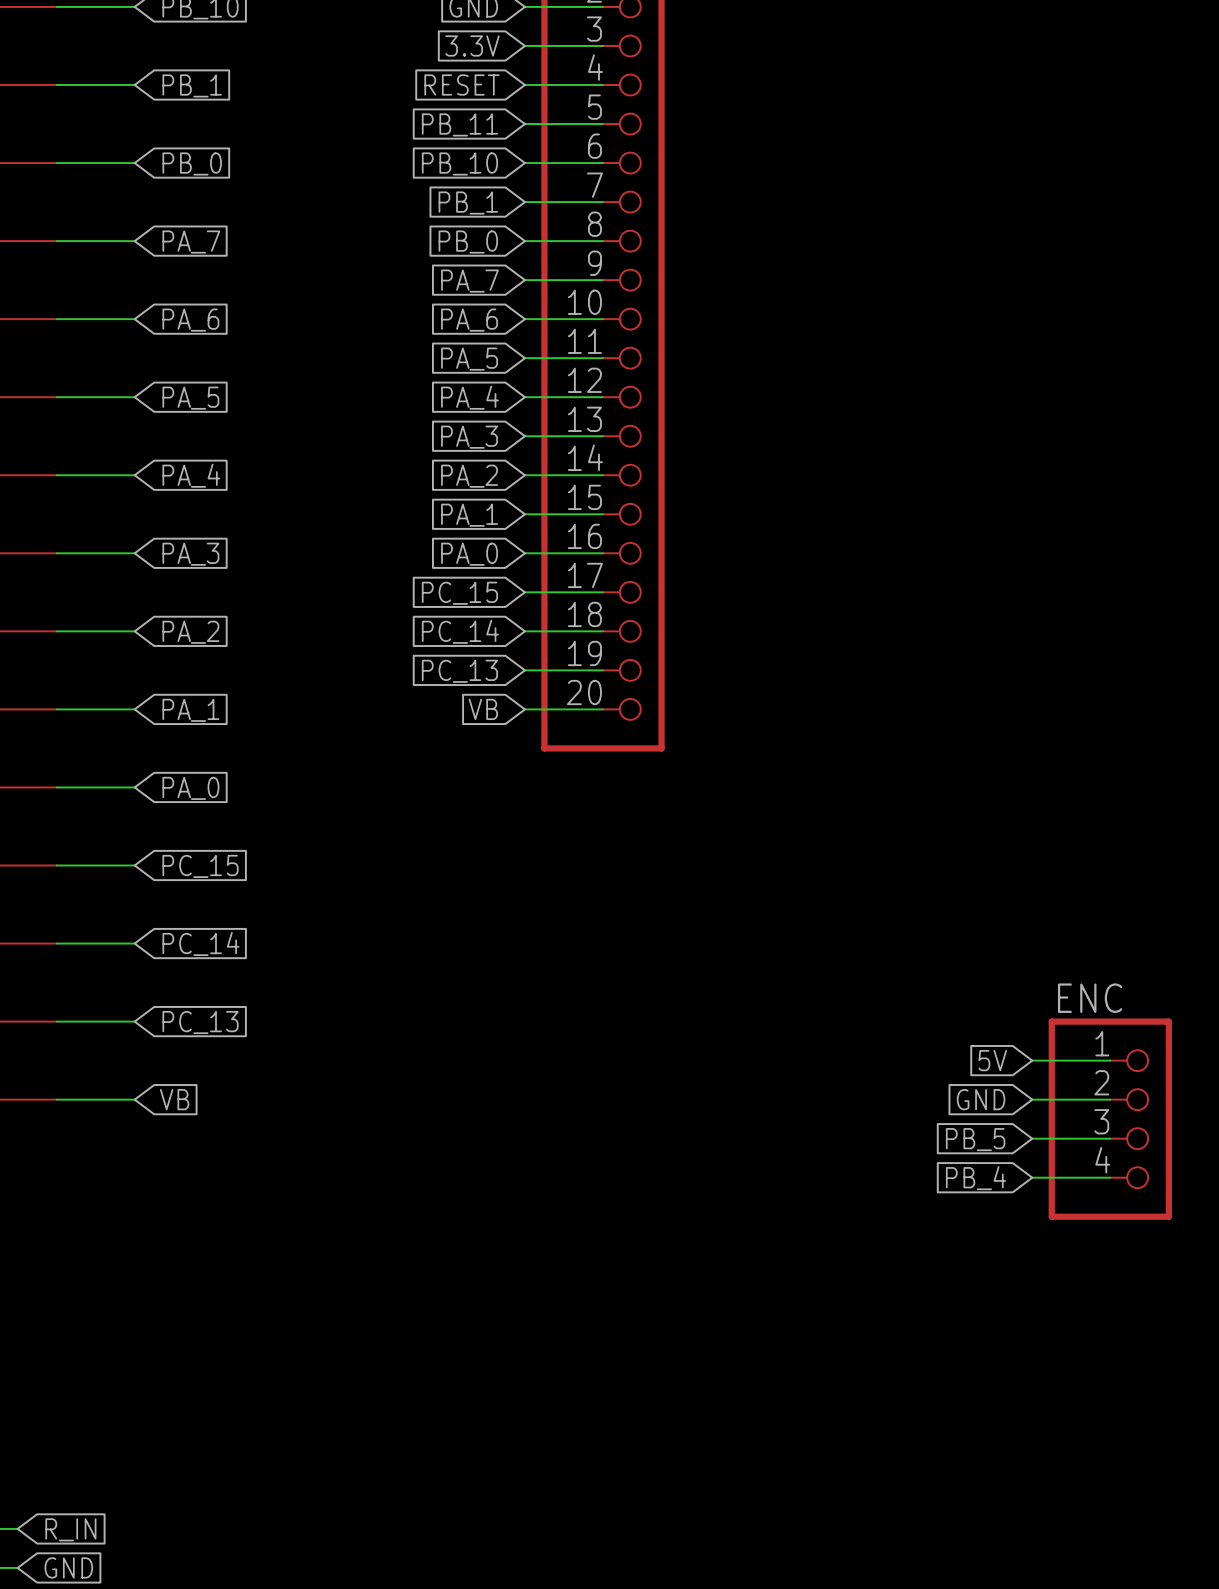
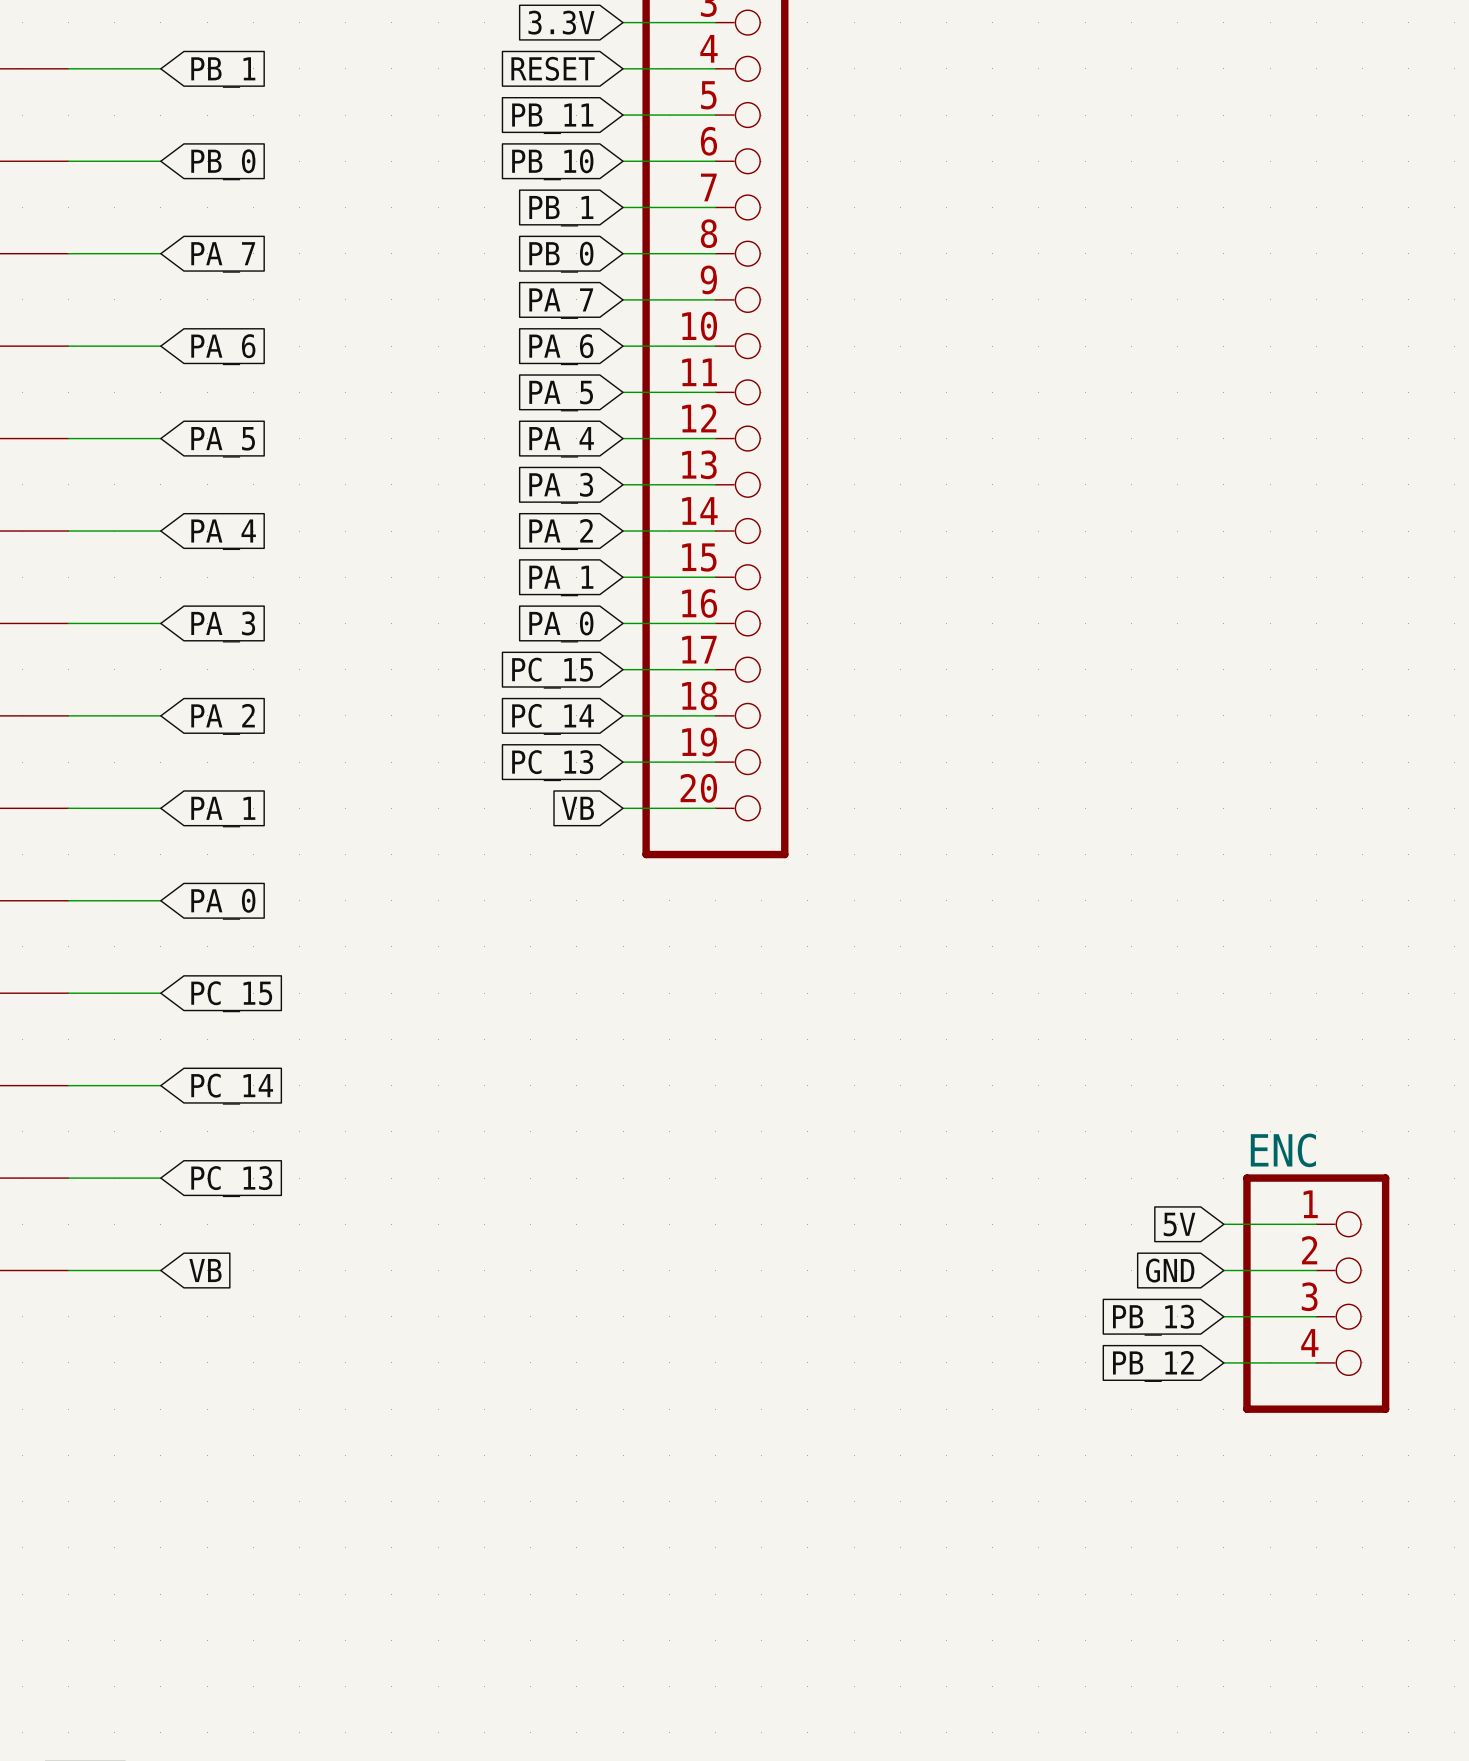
global label: PB_5 (975, 1139) -> PB_13 (1153, 1320)
global label: PB_4 (976, 1178) -> PB_12 (1153, 1366)

